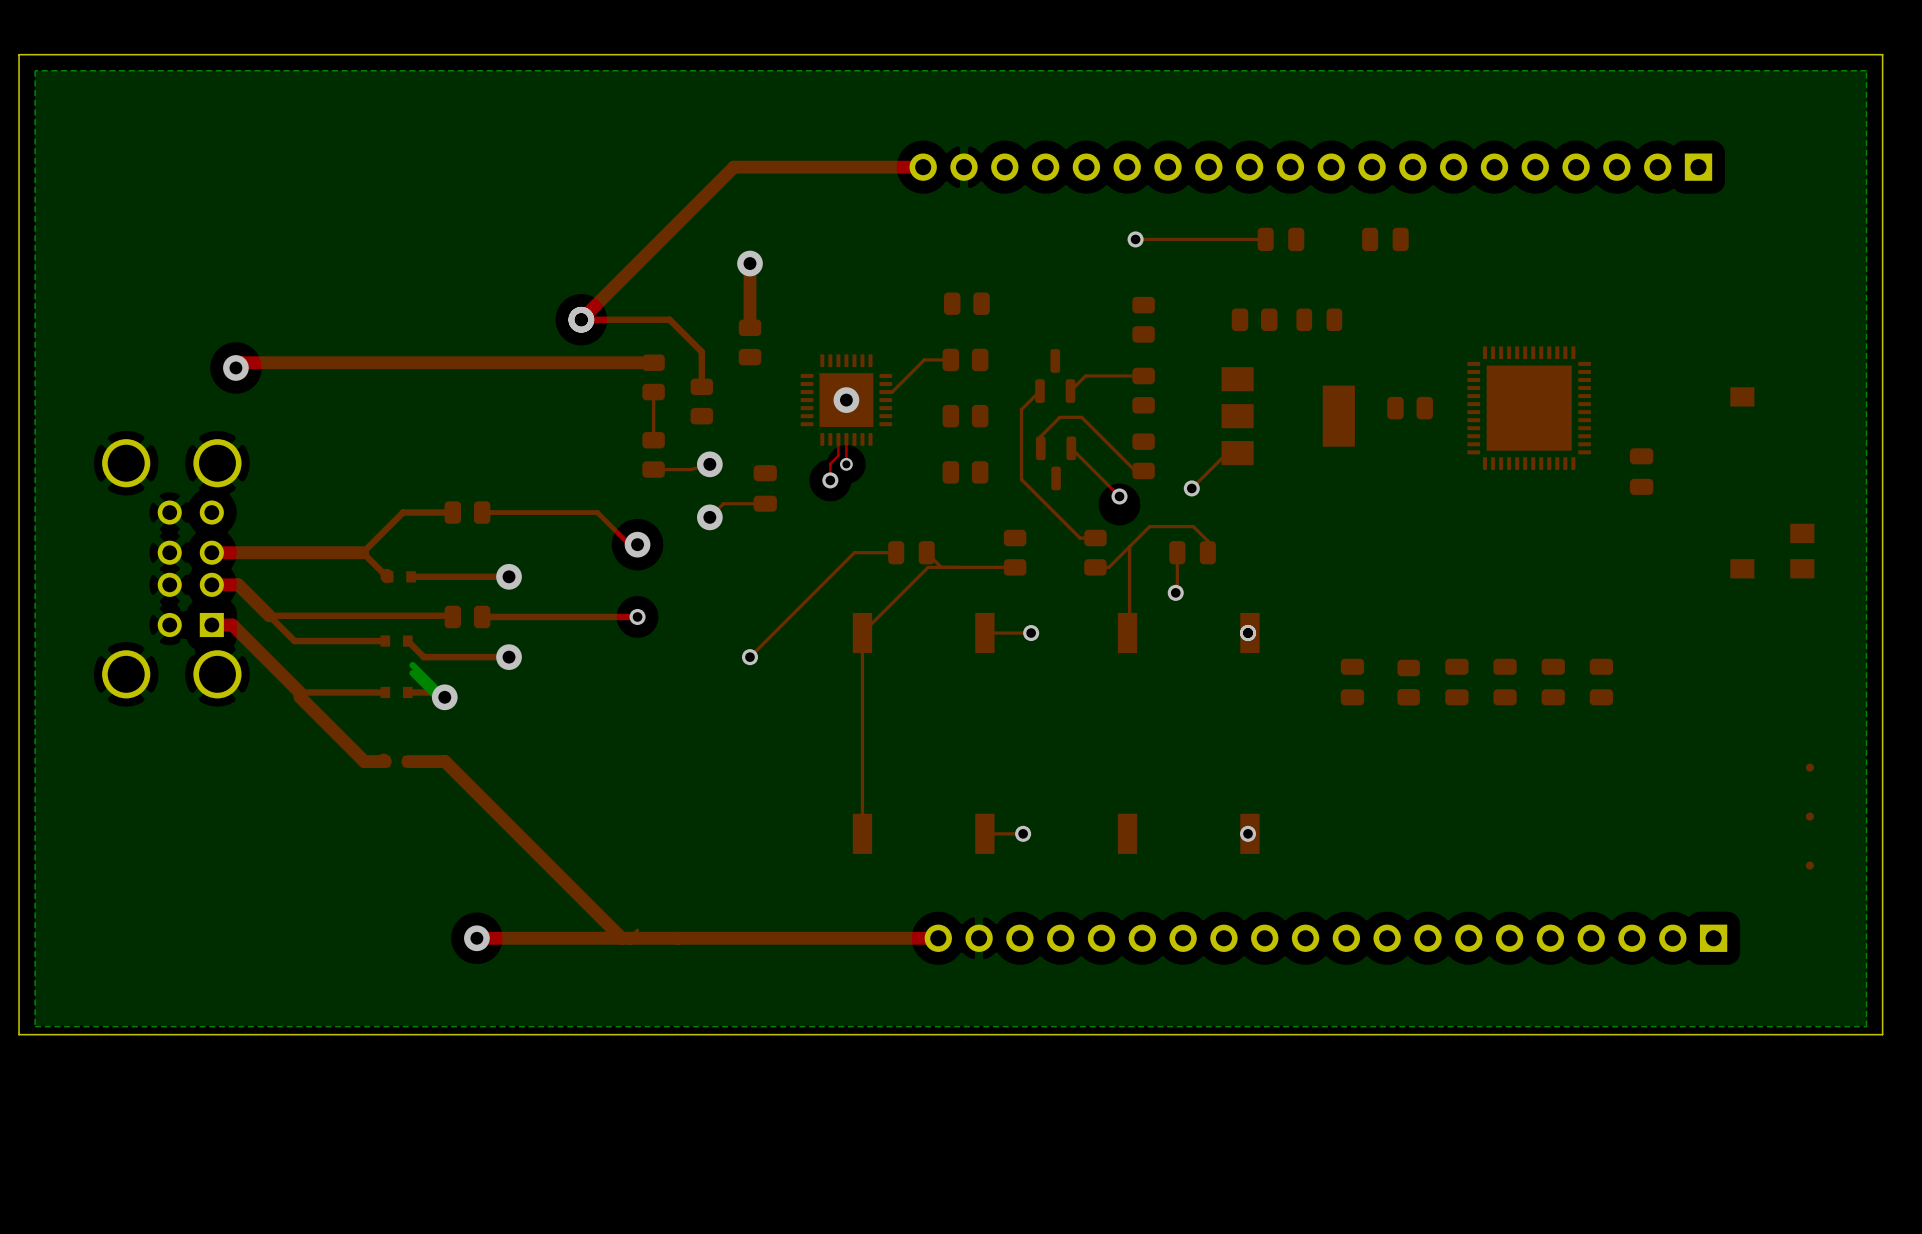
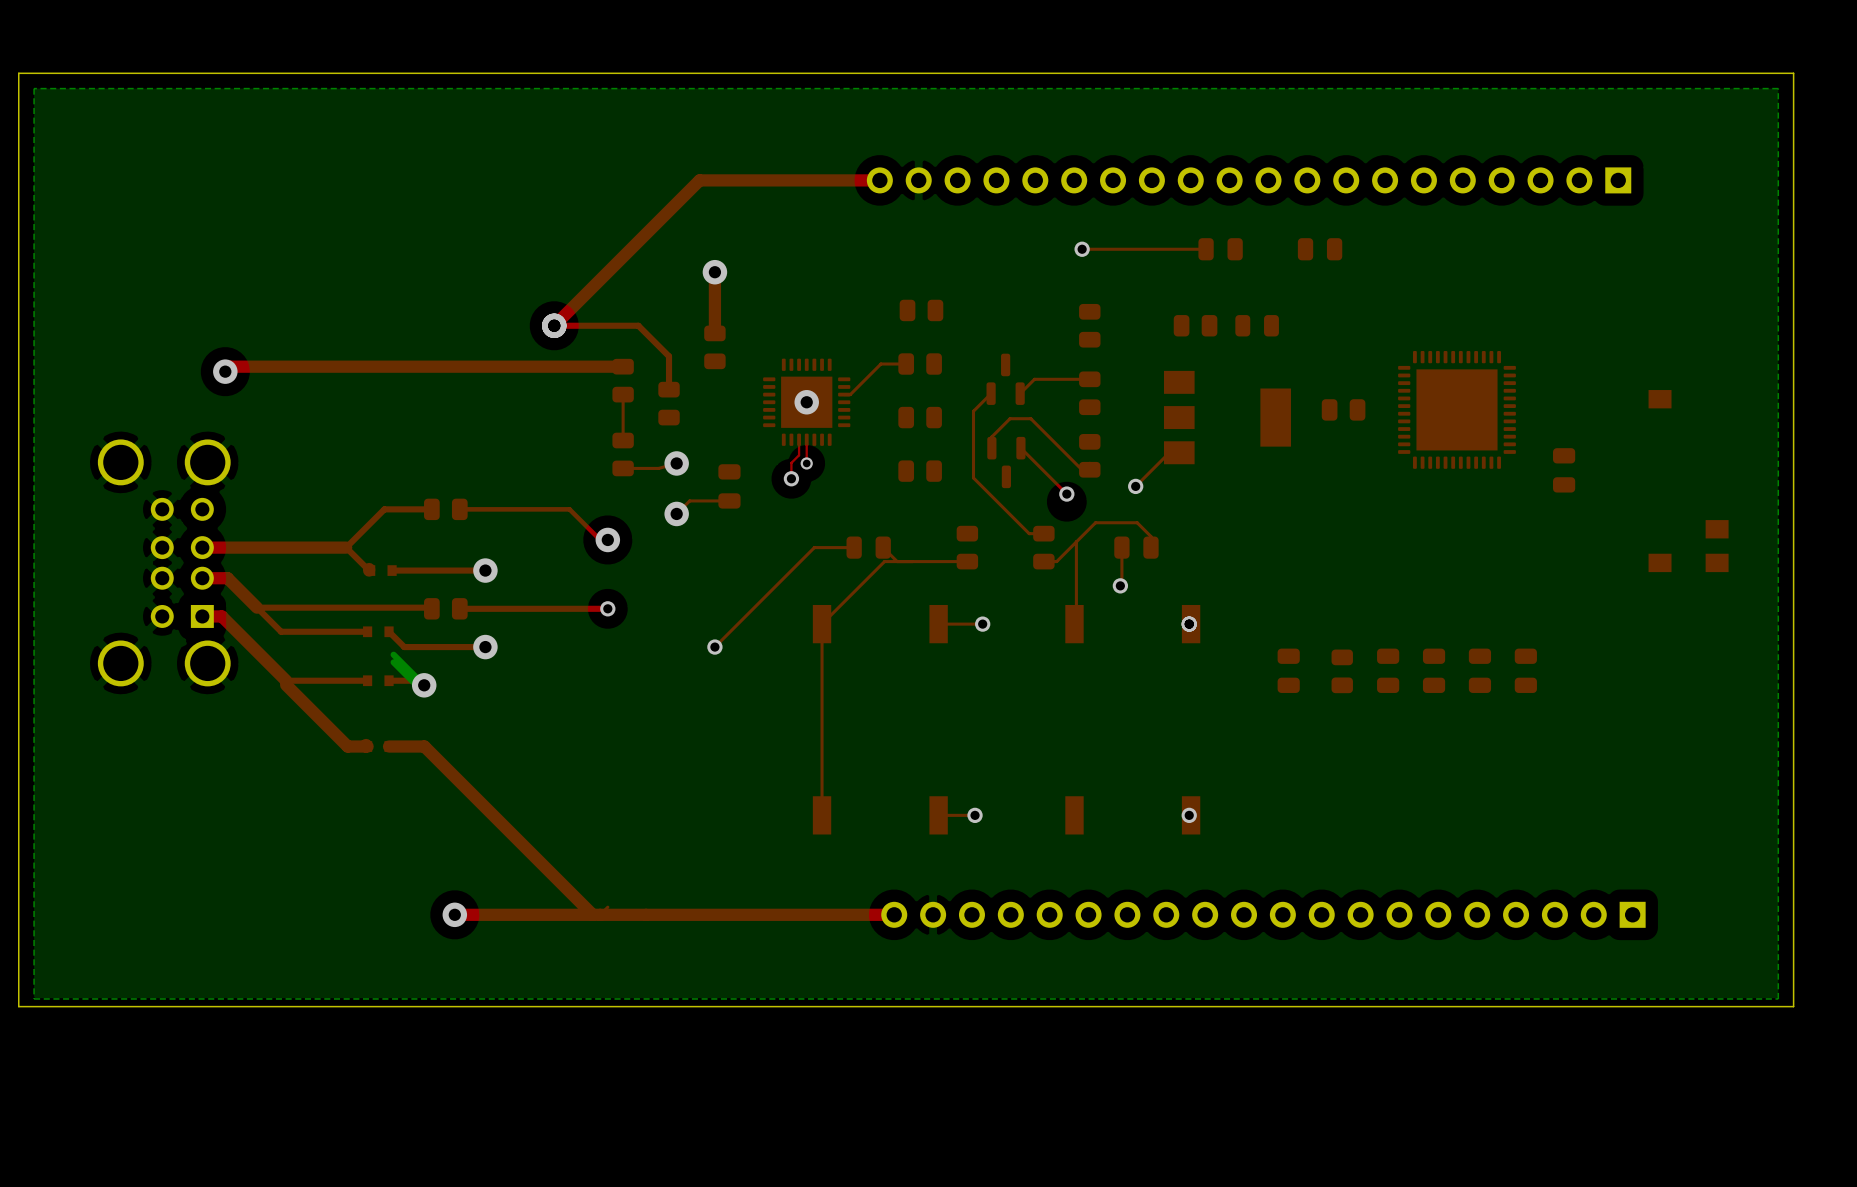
part: (1809, 767) -> none
part: (1809, 816) -> none
part: (1809, 865) -> none

